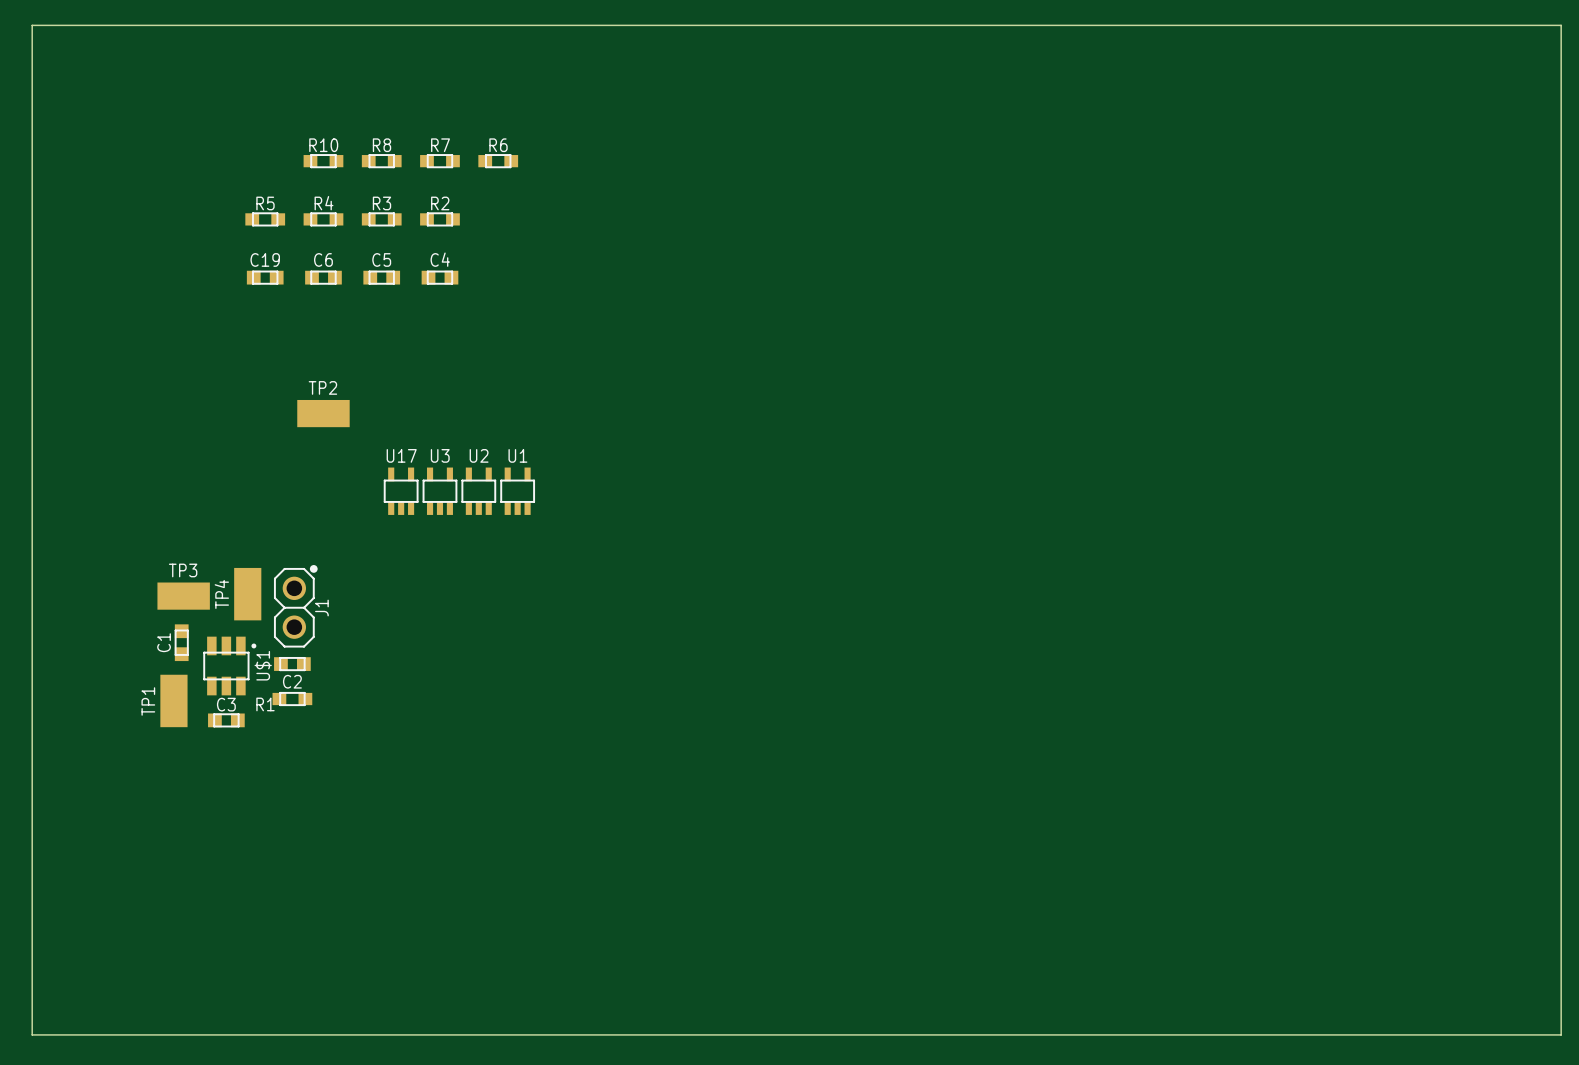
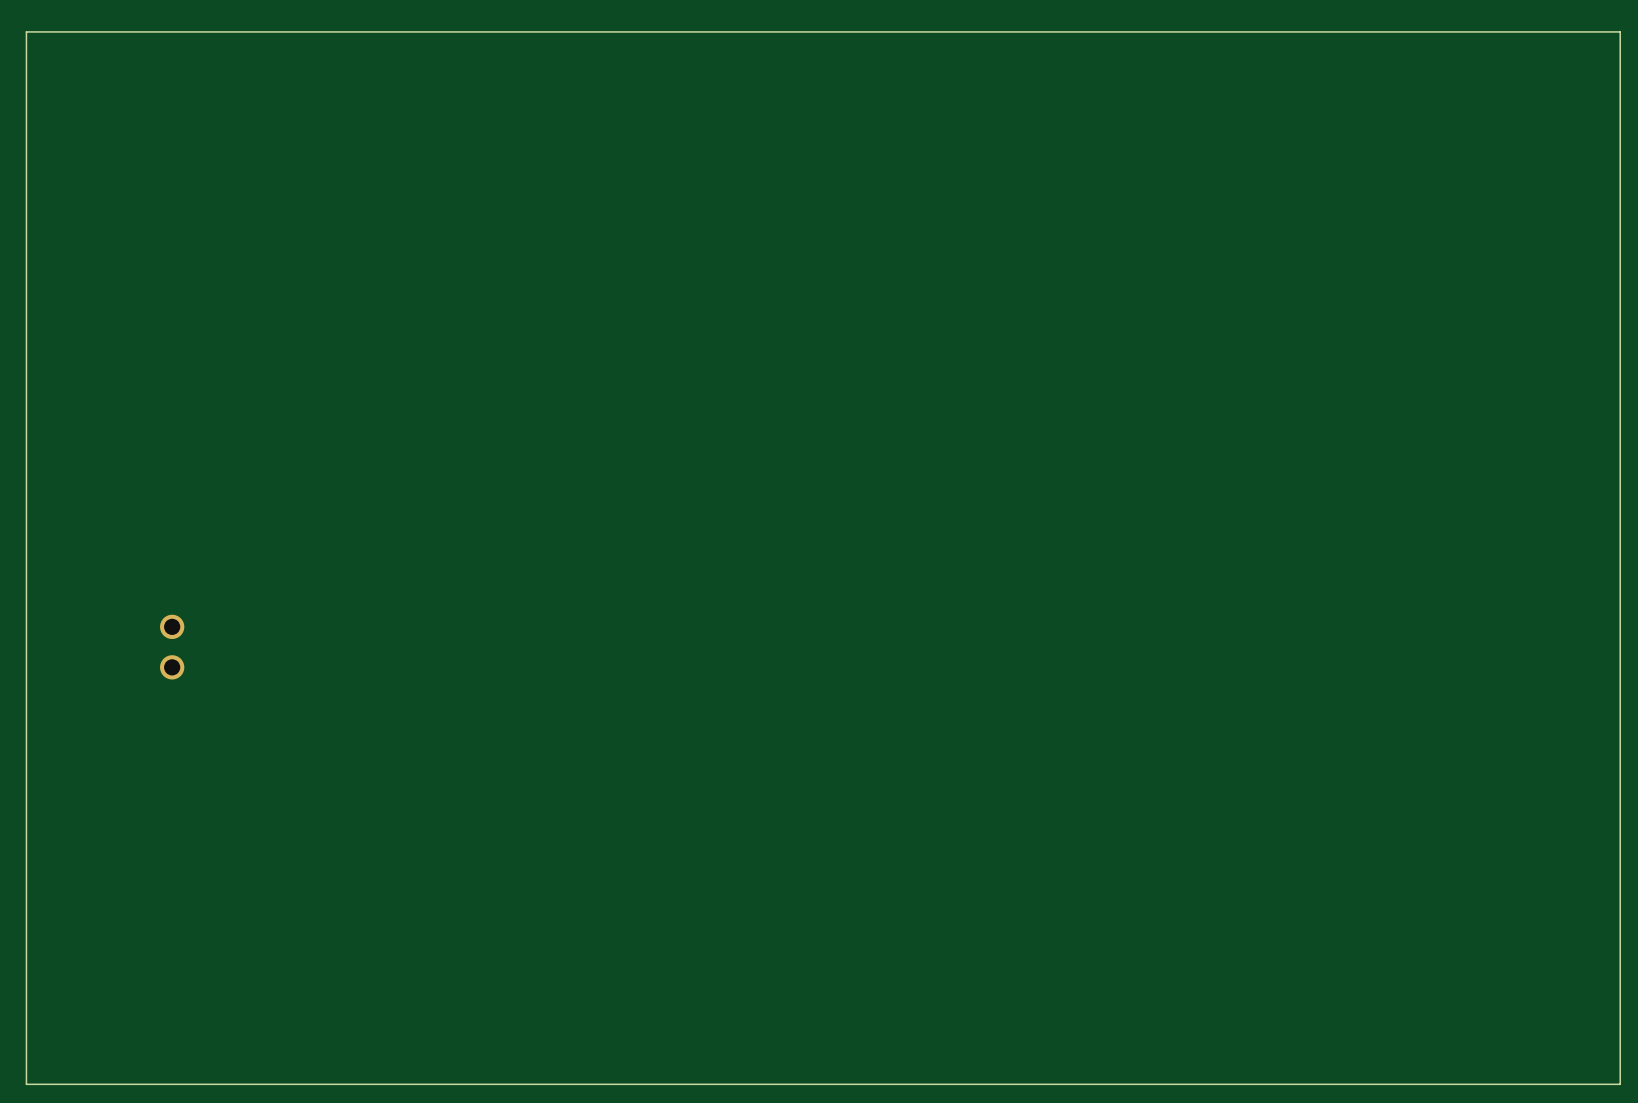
R10: (323, 161) -> none
R8: (381, 161) -> none
R7: (439, 161) -> none
R6: (498, 161) -> none
R5: (265, 219) -> none
R4: (323, 219) -> none
R3: (381, 219) -> none
R2: (439, 219) -> none
C19: (265, 277) -> none
C6: (323, 277) -> none
C5: (381, 277) -> none
C4: (439, 277) -> none
TP2: (323, 413) -> none
U17: (401, 491) -> none
U3: (439, 491) -> none
U2: (478, 491) -> none
U1: (517, 491) -> none
TP4: (247, 594) -> none
TP3: (183, 596) -> none
J1 side: top (295, 606) -> bottom (172, 647)
C1: (181, 642) -> none
C2: (292, 664) -> none
U$1: (229, 666) -> none
R1: (292, 699) -> none
TP1: (173, 700) -> none
C3: (226, 720) -> none

